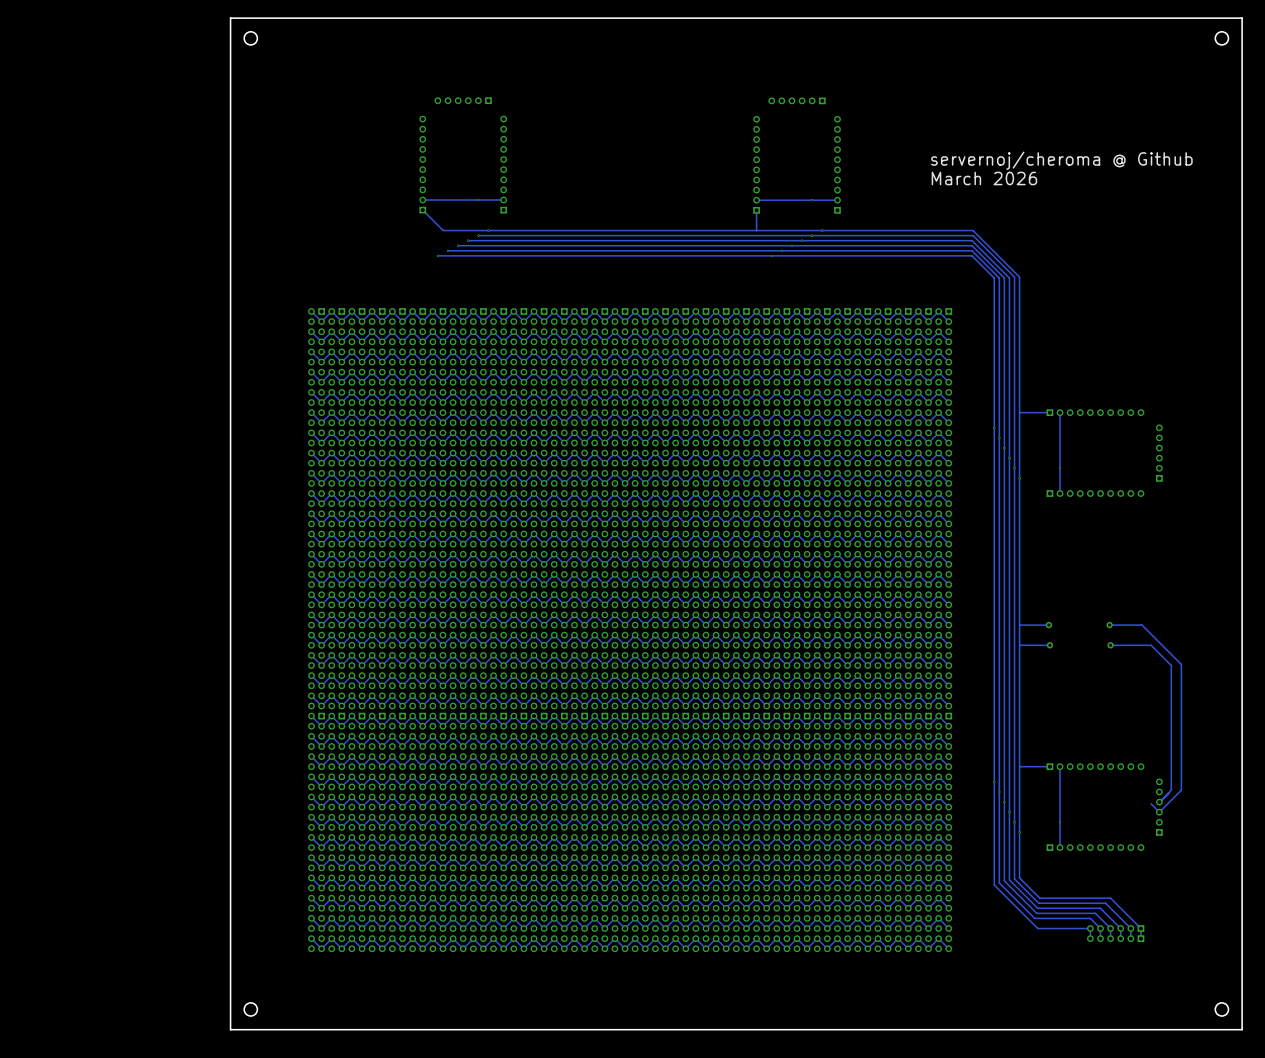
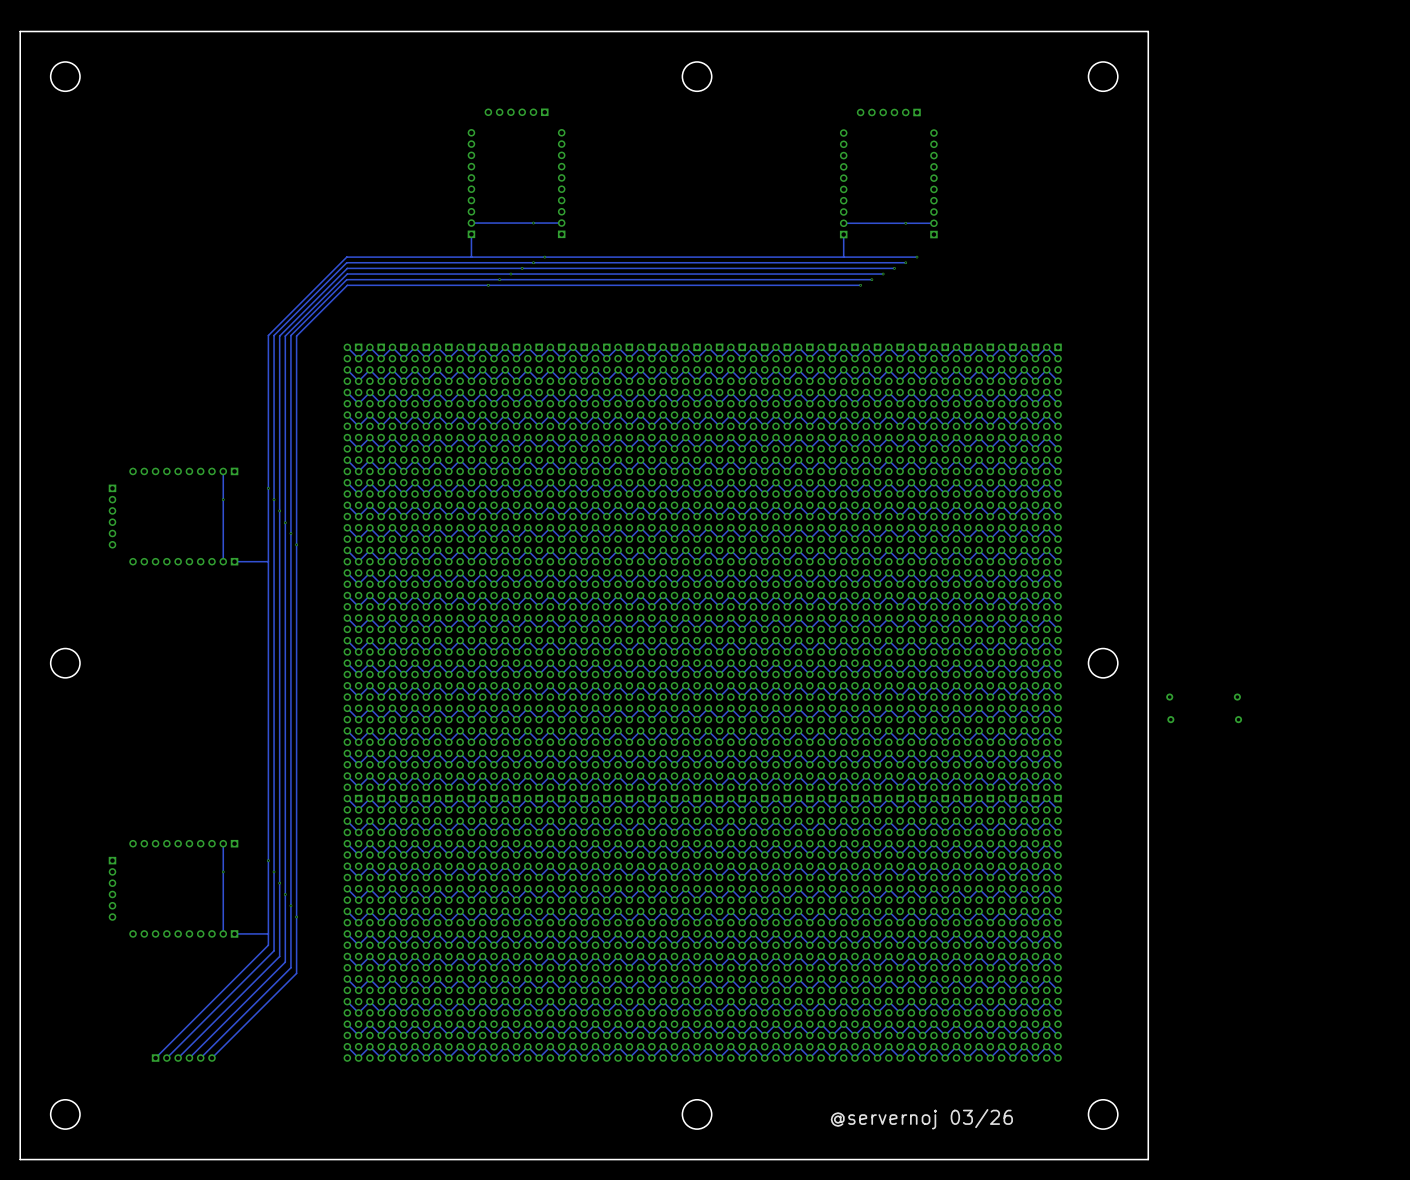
board edge: (1242, 18) (230, 18) (230, 1029) (1242, 1029) (1242, 18) -> (1148, 31) (20, 31) (20, 1159) (1148, 1159) (1148, 31)
round board edge: [244, 31, 258, 46] -> none
round board edge: [1215, 31, 1229, 46] -> none
round board edge: none -> [50, 61, 81, 92]
round board edge: none -> [682, 61, 712, 92]
round board edge: none -> [1088, 61, 1119, 92]
text: servernoj/cheroma @ Github (1061, 160) -> none
text: March 2026 (984, 178) -> none
track: (422, 210) (443, 230) -> (471, 234) (471, 257)
track: none -> (494, 257) (346, 257) (268, 335) (268, 945) (155, 1058)
track: (822, 230) (973, 230) (1019, 277) (1019, 877) (1039, 898) (1110, 898) (1140, 928) (1140, 938) -> none
track: none -> (533, 262) (346, 262) (274, 335) (274, 950) (166, 1058)
track: (812, 235) (973, 235) (1014, 277) (1014, 878) (1038, 903) (1105, 903) (1130, 928) (1130, 938) -> none
track: none -> (522, 268) (347, 268) (279, 336) (279, 956) (178, 1058)
track: (802, 240) (972, 240) (1009, 278) (1009, 879) (1037, 908) (1100, 908) (1120, 928) (1120, 938) -> none
track: none -> (510, 274) (347, 274) (285, 336) (285, 962) (189, 1058)
track: (791, 245) (972, 245) (1004, 278) (1004, 880) (1036, 913) (1095, 913) (1110, 928) (1110, 938) -> none
track: none -> (499, 279) (346, 279) (290, 335) (290, 967) (200, 1058)
track: (781, 250) (972, 250) (999, 278) (999, 883) (1034, 918) (1090, 918) (1100, 928) (1100, 938) -> none
track: none -> (488, 285) (347, 285) (296, 336) (296, 973) (211, 1058)
track: (771, 255) (972, 255) (994, 278) (994, 885) (1037, 928) (1090, 928) (1090, 938) -> none
track: (1049, 412) (1019, 412) -> none
track: (1060, 412) (1060, 493) -> none
part: (1095, 412) -> none
part: none -> (183, 471)
track: none -> (223, 471) (223, 561)
via: (994, 427) -> none
via: none -> (268, 488)
via: (999, 437) -> none
via: none -> (223, 499)
via: none -> (274, 499)
via: (1004, 448) -> none
part: (1159, 453) -> none
via: none -> (279, 510)
via: (1009, 458) -> none
part: none -> (112, 516)
via: none -> (285, 522)
via: (1014, 468) -> none
via: (1060, 468) -> none
via: none -> (290, 533)
via: (1019, 478) -> none
via: none -> (296, 544)
part: (1095, 493) -> none
part: none -> (183, 561)
track: none -> (268, 561) (234, 561)
round board edge: none -> [50, 648, 81, 679]
round board edge: none -> [1088, 648, 1119, 679]
track: (1049, 625) (1019, 625) -> none
track: (1109, 625) (1141, 625) (1181, 664) (1181, 790) (1159, 812) (1151, 803) -> none
track: (1049, 645) (1019, 645) -> none
track: (1110, 645) (1151, 645) (1171, 665) (1171, 790) (1159, 802) (1169, 792) -> none
part: none -> (183, 843)
track: none -> (223, 843) (223, 933)
track: (1049, 766) (1019, 766) -> none
track: (1060, 766) (1060, 847) -> none
part: (1095, 766) -> none
via: none -> (268, 860)
via: none -> (223, 871)
via: none -> (274, 871)
via: (994, 781) -> none
via: none -> (279, 883)
via: (999, 791) -> none
part: none -> (112, 888)
via: none -> (285, 894)
via: (1004, 802) -> none
part: (1159, 807) -> none
via: none -> (290, 905)
via: (1009, 812) -> none
via: none -> (296, 917)
via: (1014, 822) -> none
via: (1060, 822) -> none
via: (1019, 832) -> none
part: none -> (183, 933)
track: none -> (268, 933) (234, 933)
part: (1095, 847) -> none
part: (1115, 928) -> none
part: (1115, 938) -> none
part: none -> (183, 1058)
round board edge: none -> [50, 1099, 81, 1130]
round board edge: none -> [682, 1099, 712, 1130]
round board edge: none -> [1088, 1099, 1119, 1130]
round board edge: [244, 1002, 258, 1017] -> none
round board edge: [1215, 1002, 1229, 1017] -> none
text: none -> @servernoj 03/26 (921, 1119)

